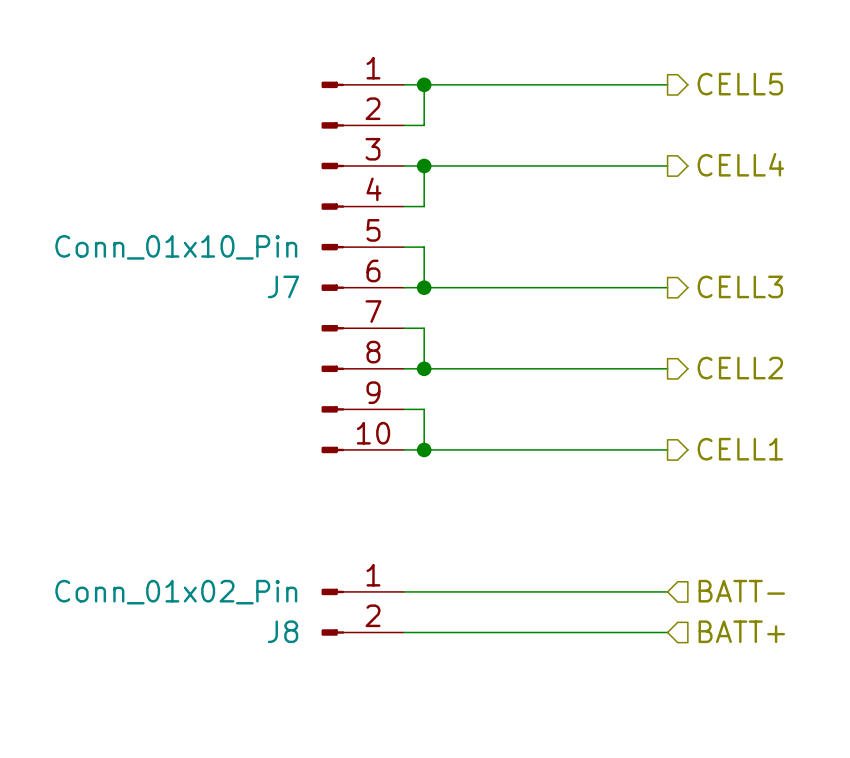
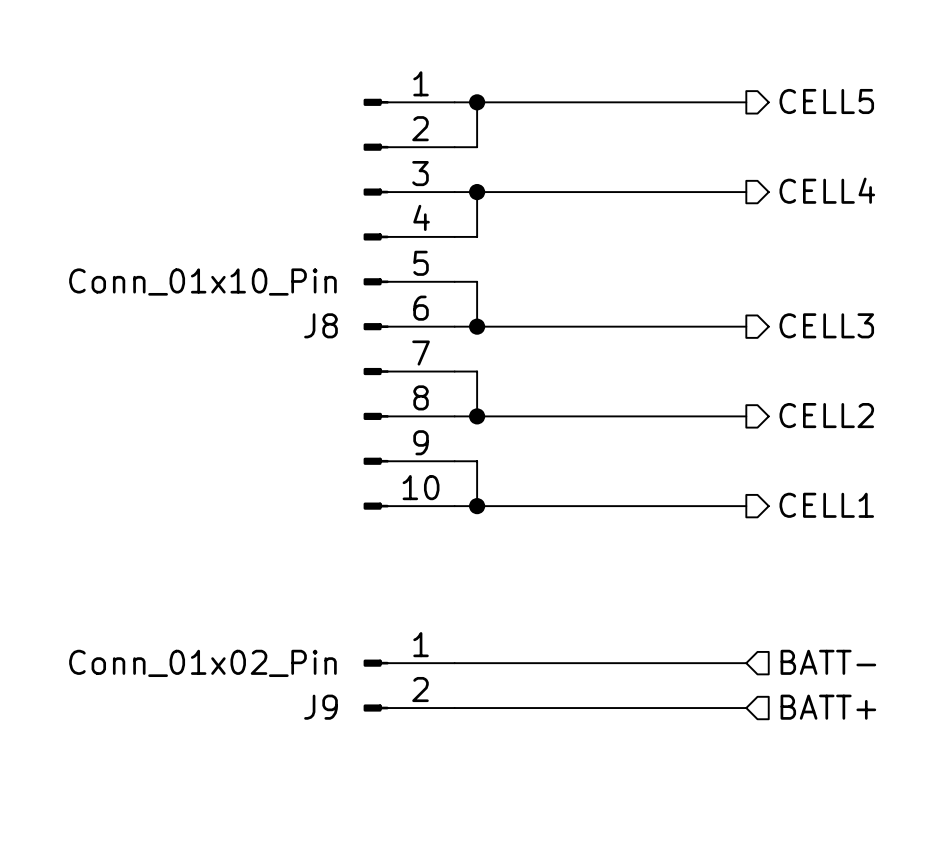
J7 name: J7 (283, 286) -> J8 (320, 325)
J8 name: J8 (283, 631) -> J9 (320, 707)

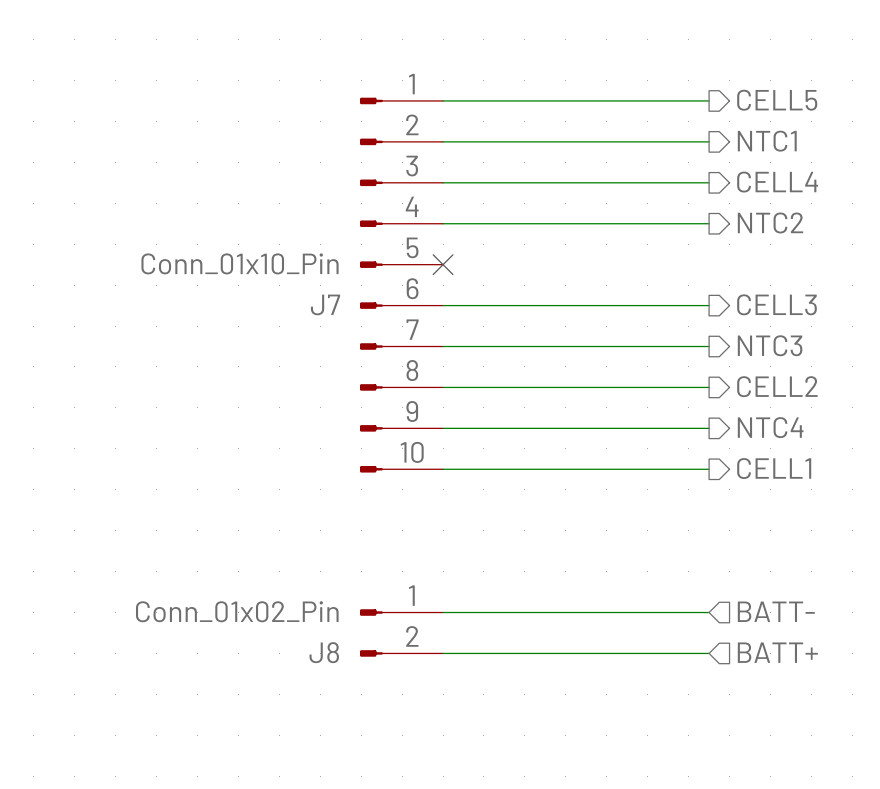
wire: (477, 102) (477, 147) -> (709, 141) (463, 141)
junction: (477, 102) -> none
hierarchical label: none -> NTC1 (767, 141)
wire: (477, 192) (477, 236) -> (709, 223) (463, 223)
junction: (477, 192) -> none
hierarchical label: none -> NTC2 (770, 222)
wire: (454, 281) (477, 281) (477, 326) -> none
no-connect mark: none -> (443, 264)
J8 name: J8 (320, 325) -> J7 (325, 304)
junction: (477, 326) -> none
hierarchical label: none -> NTC3 (770, 345)
wire: (477, 371) (477, 416) -> (463, 346) (709, 346)
junction: (477, 416) -> none
hierarchical label: none -> NTC4 (770, 427)
wire: (477, 461) (477, 506) -> (463, 428) (709, 428)
junction: (477, 506) -> none
J9 name: J9 (320, 707) -> J8 (324, 652)

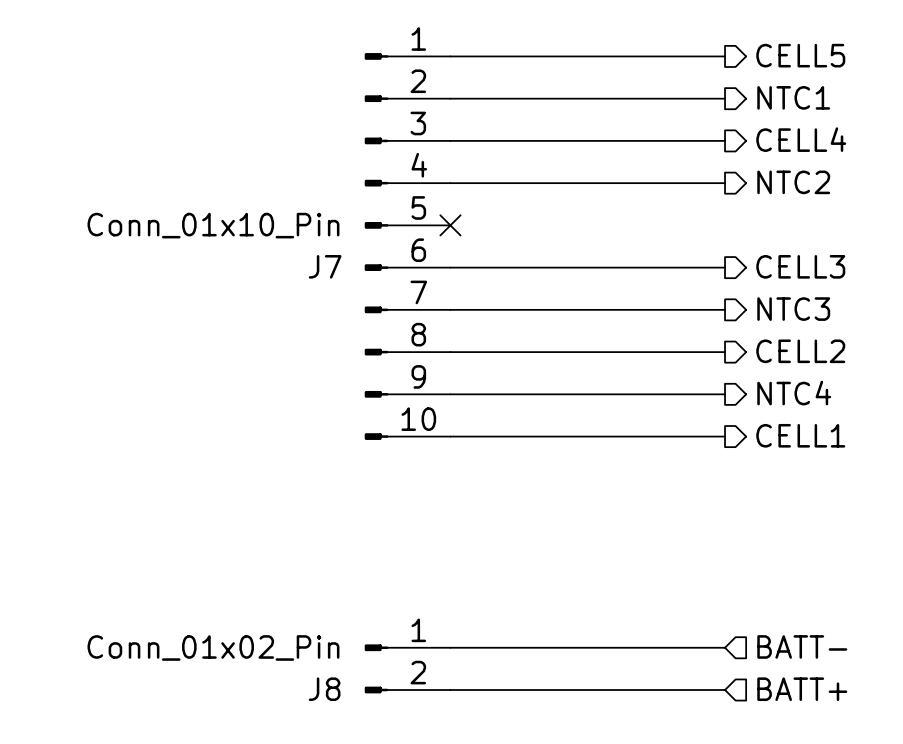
hierarchical label position: BATT- (776, 611) -> BATT- (802, 646)
wire: (443, 612) (709, 612) -> (450, 647) (725, 647)
J8 position: (401, 632) -> (407, 668)
hierarchical label position: BATT+ (777, 652) -> BATT+ (802, 689)
wire: (443, 653) (709, 653) -> (450, 690) (725, 690)

